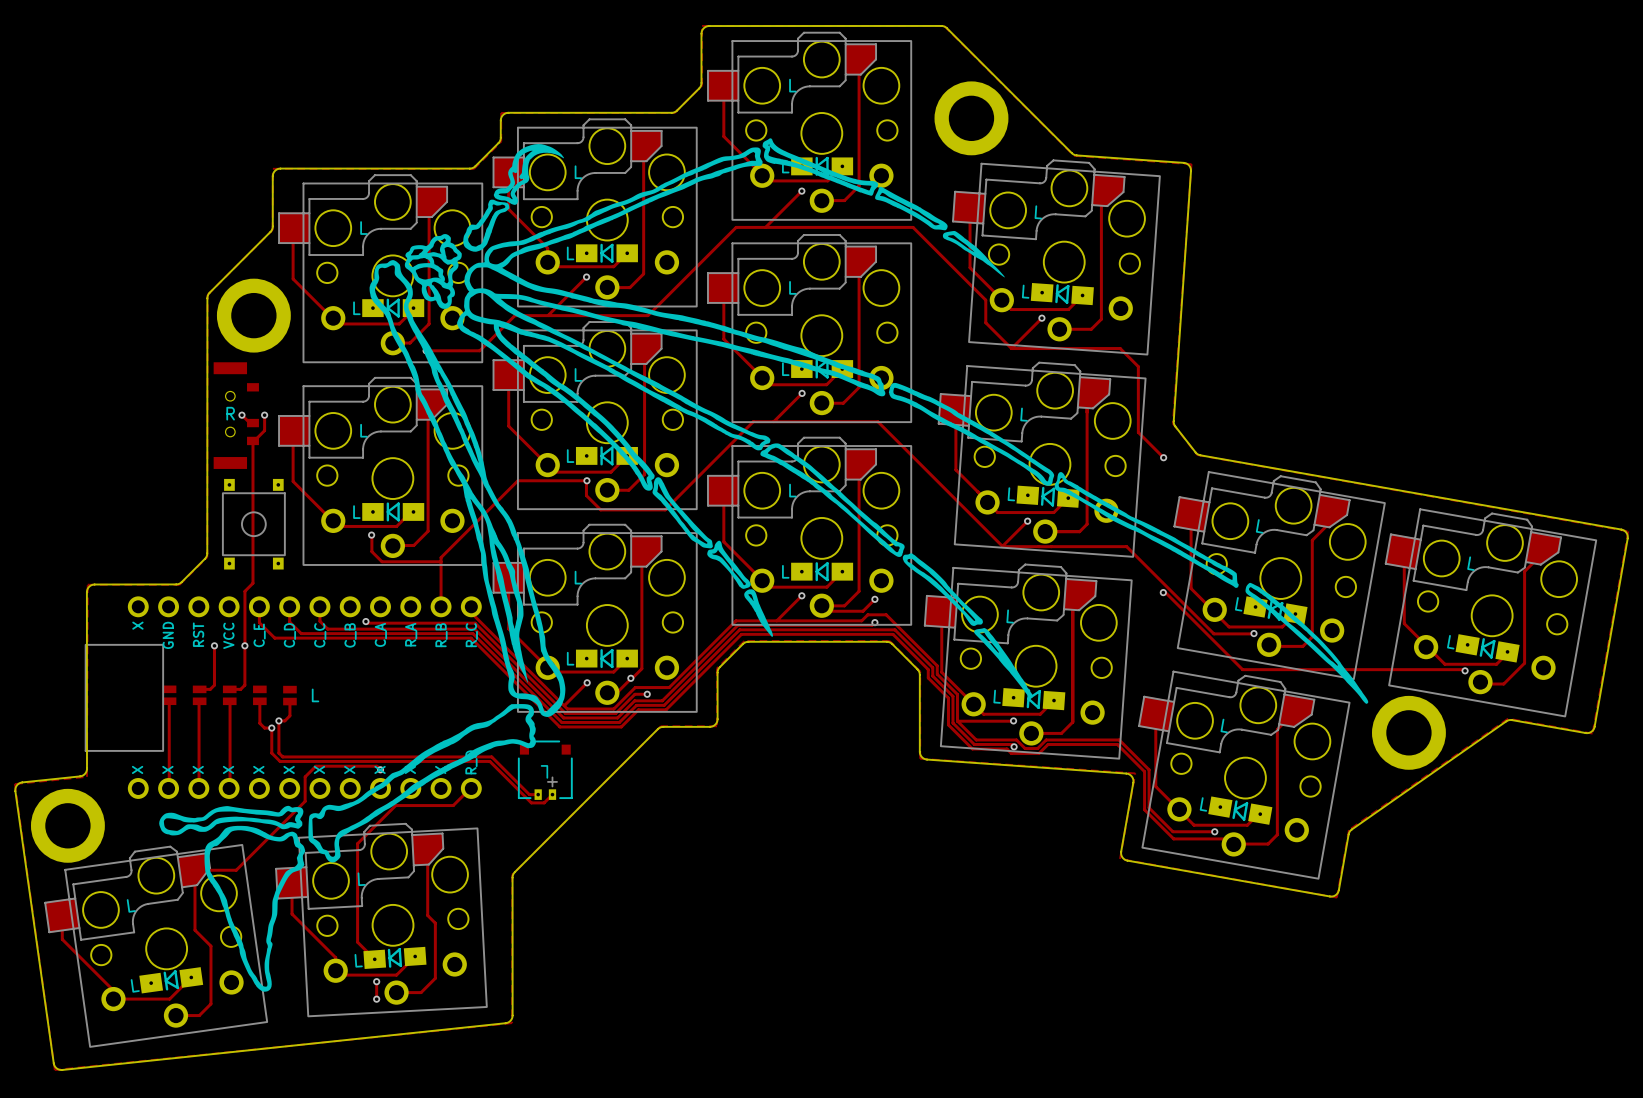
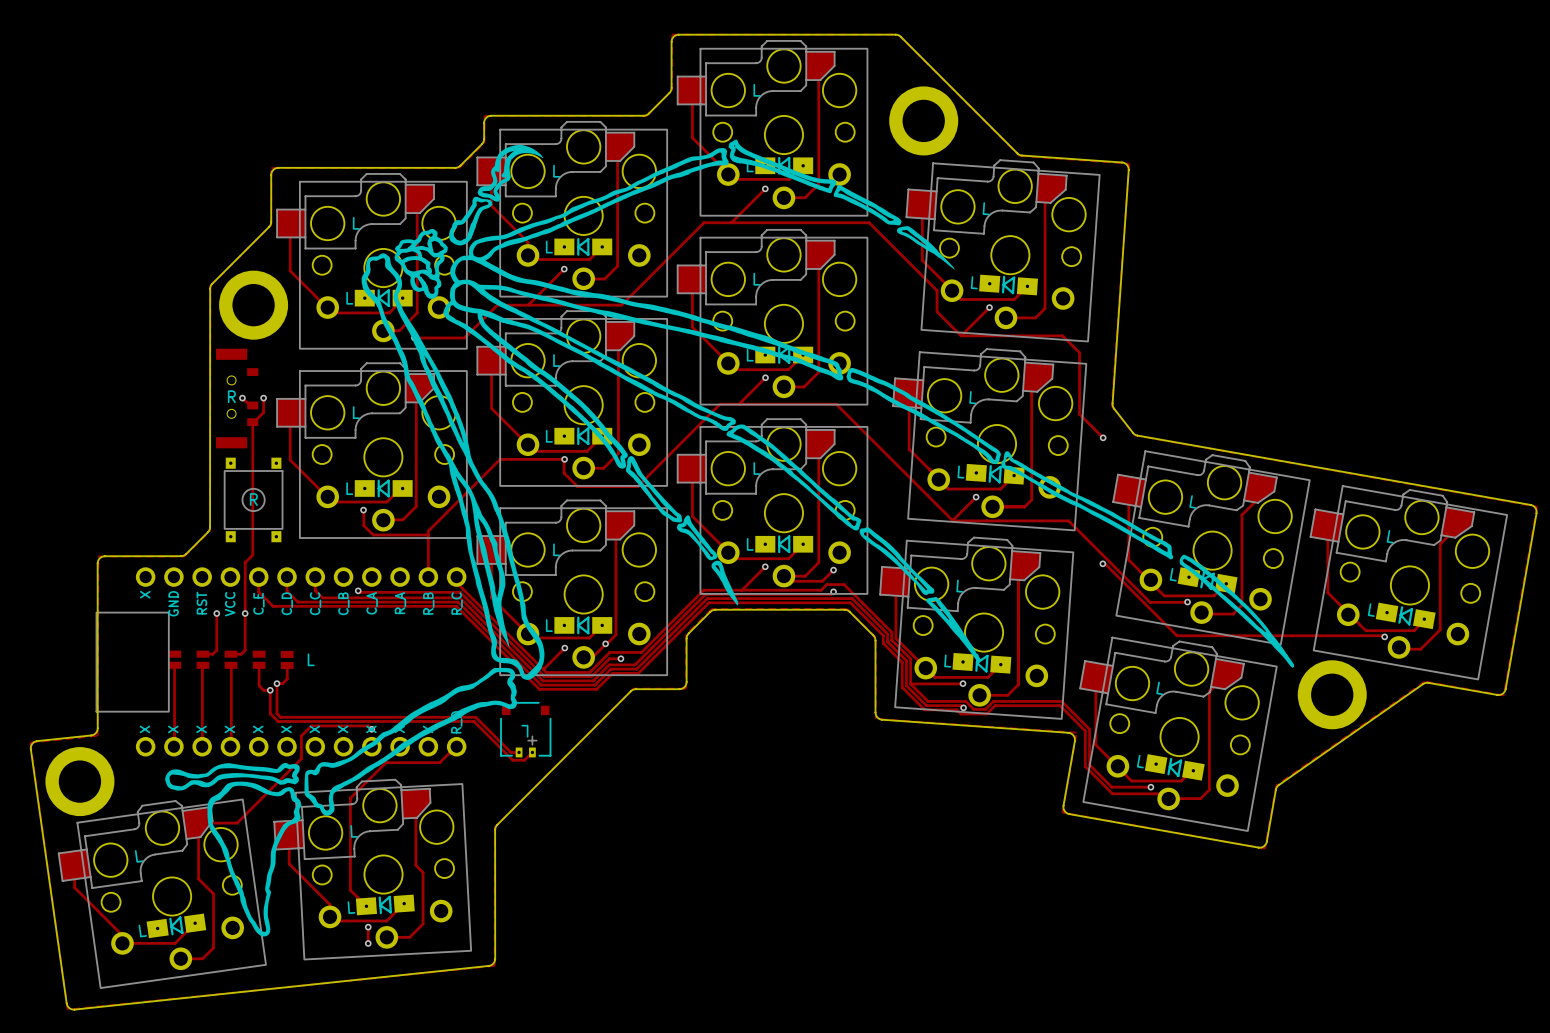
part text: none -> R (253, 499)

